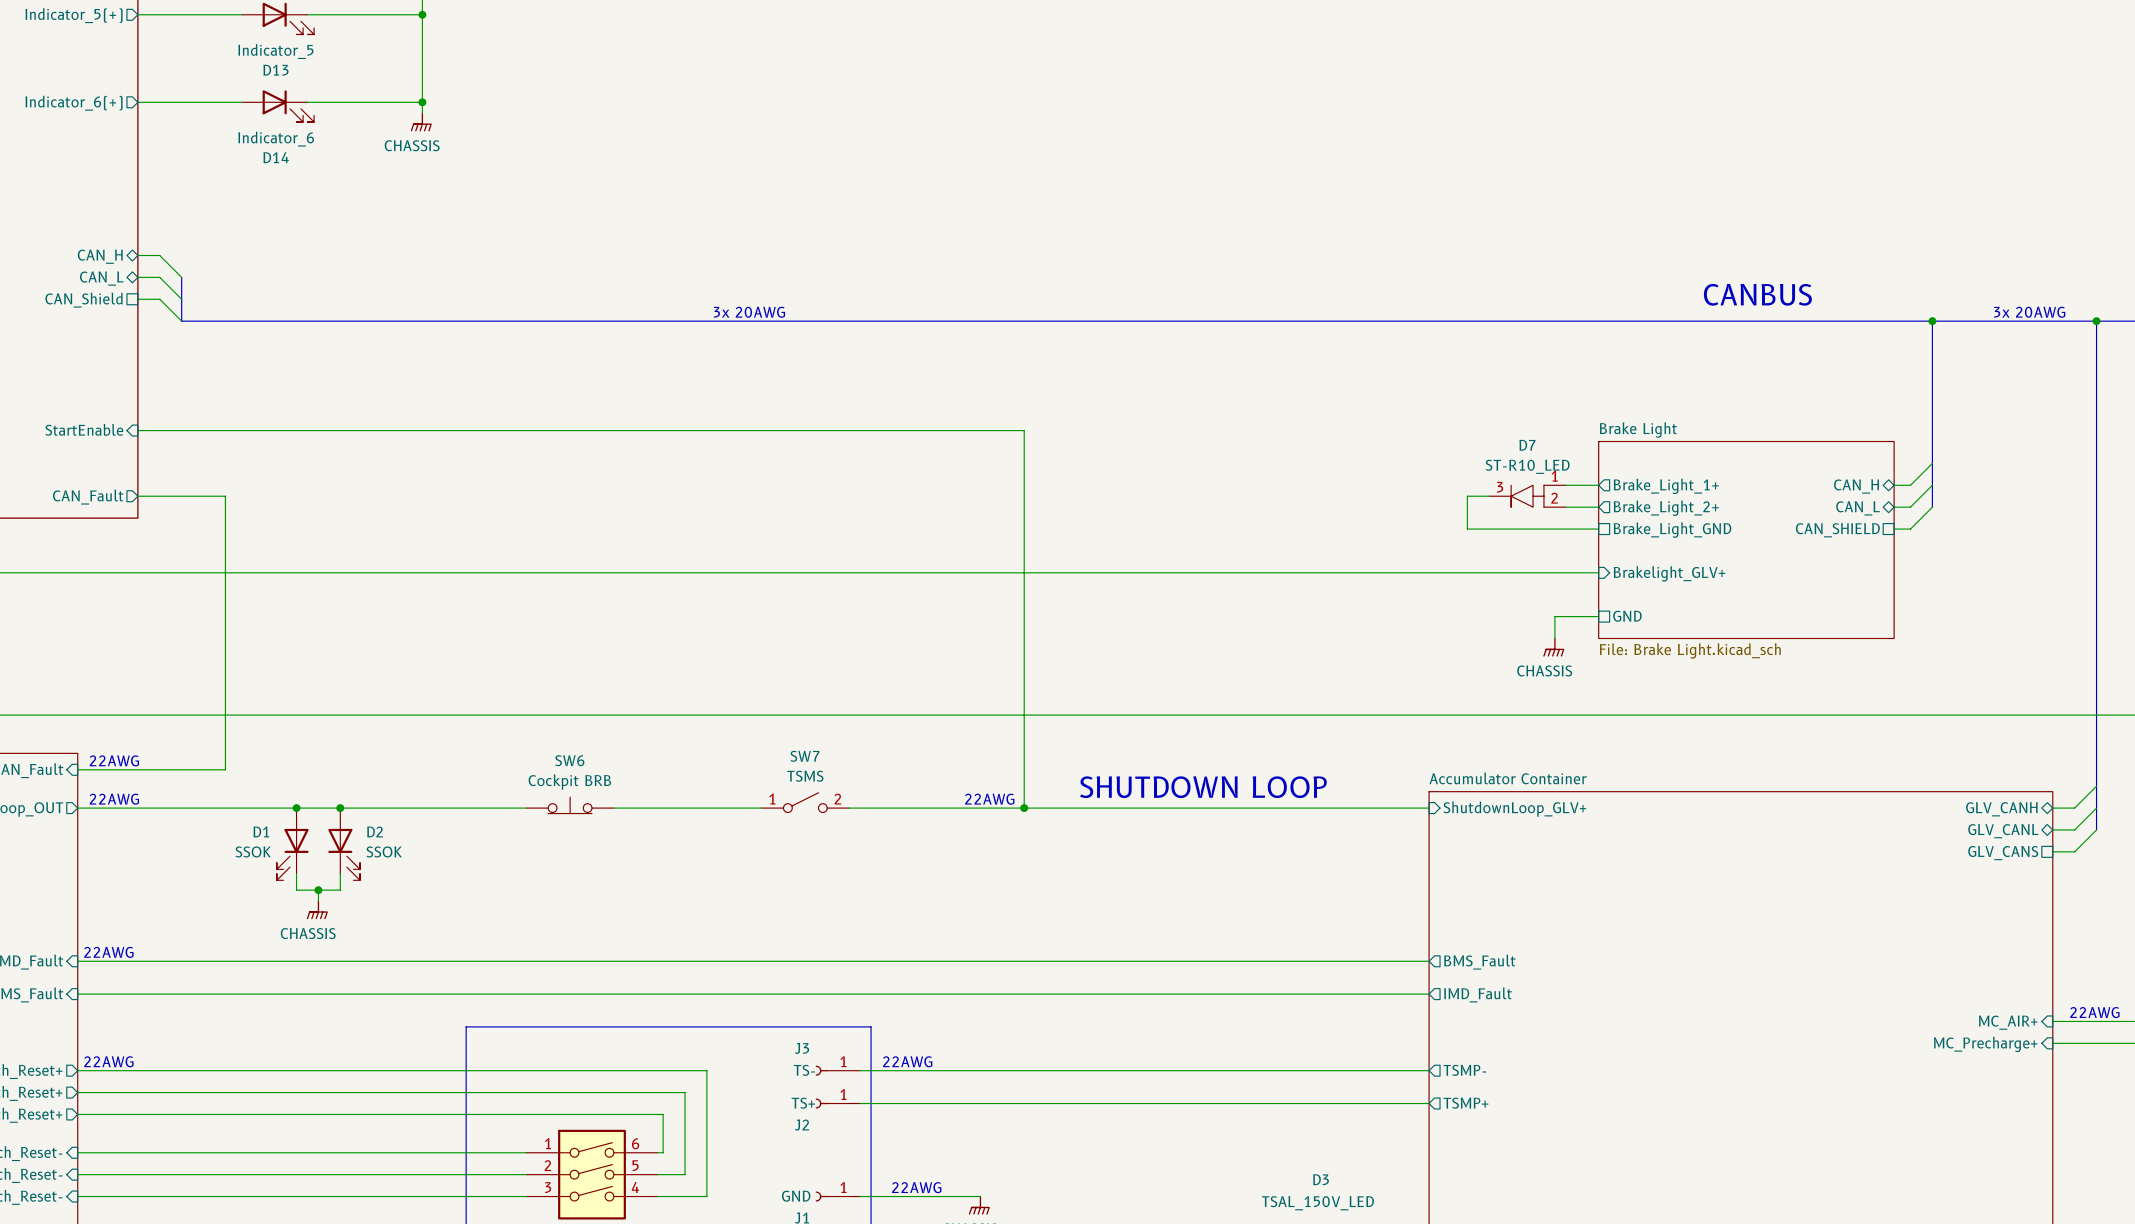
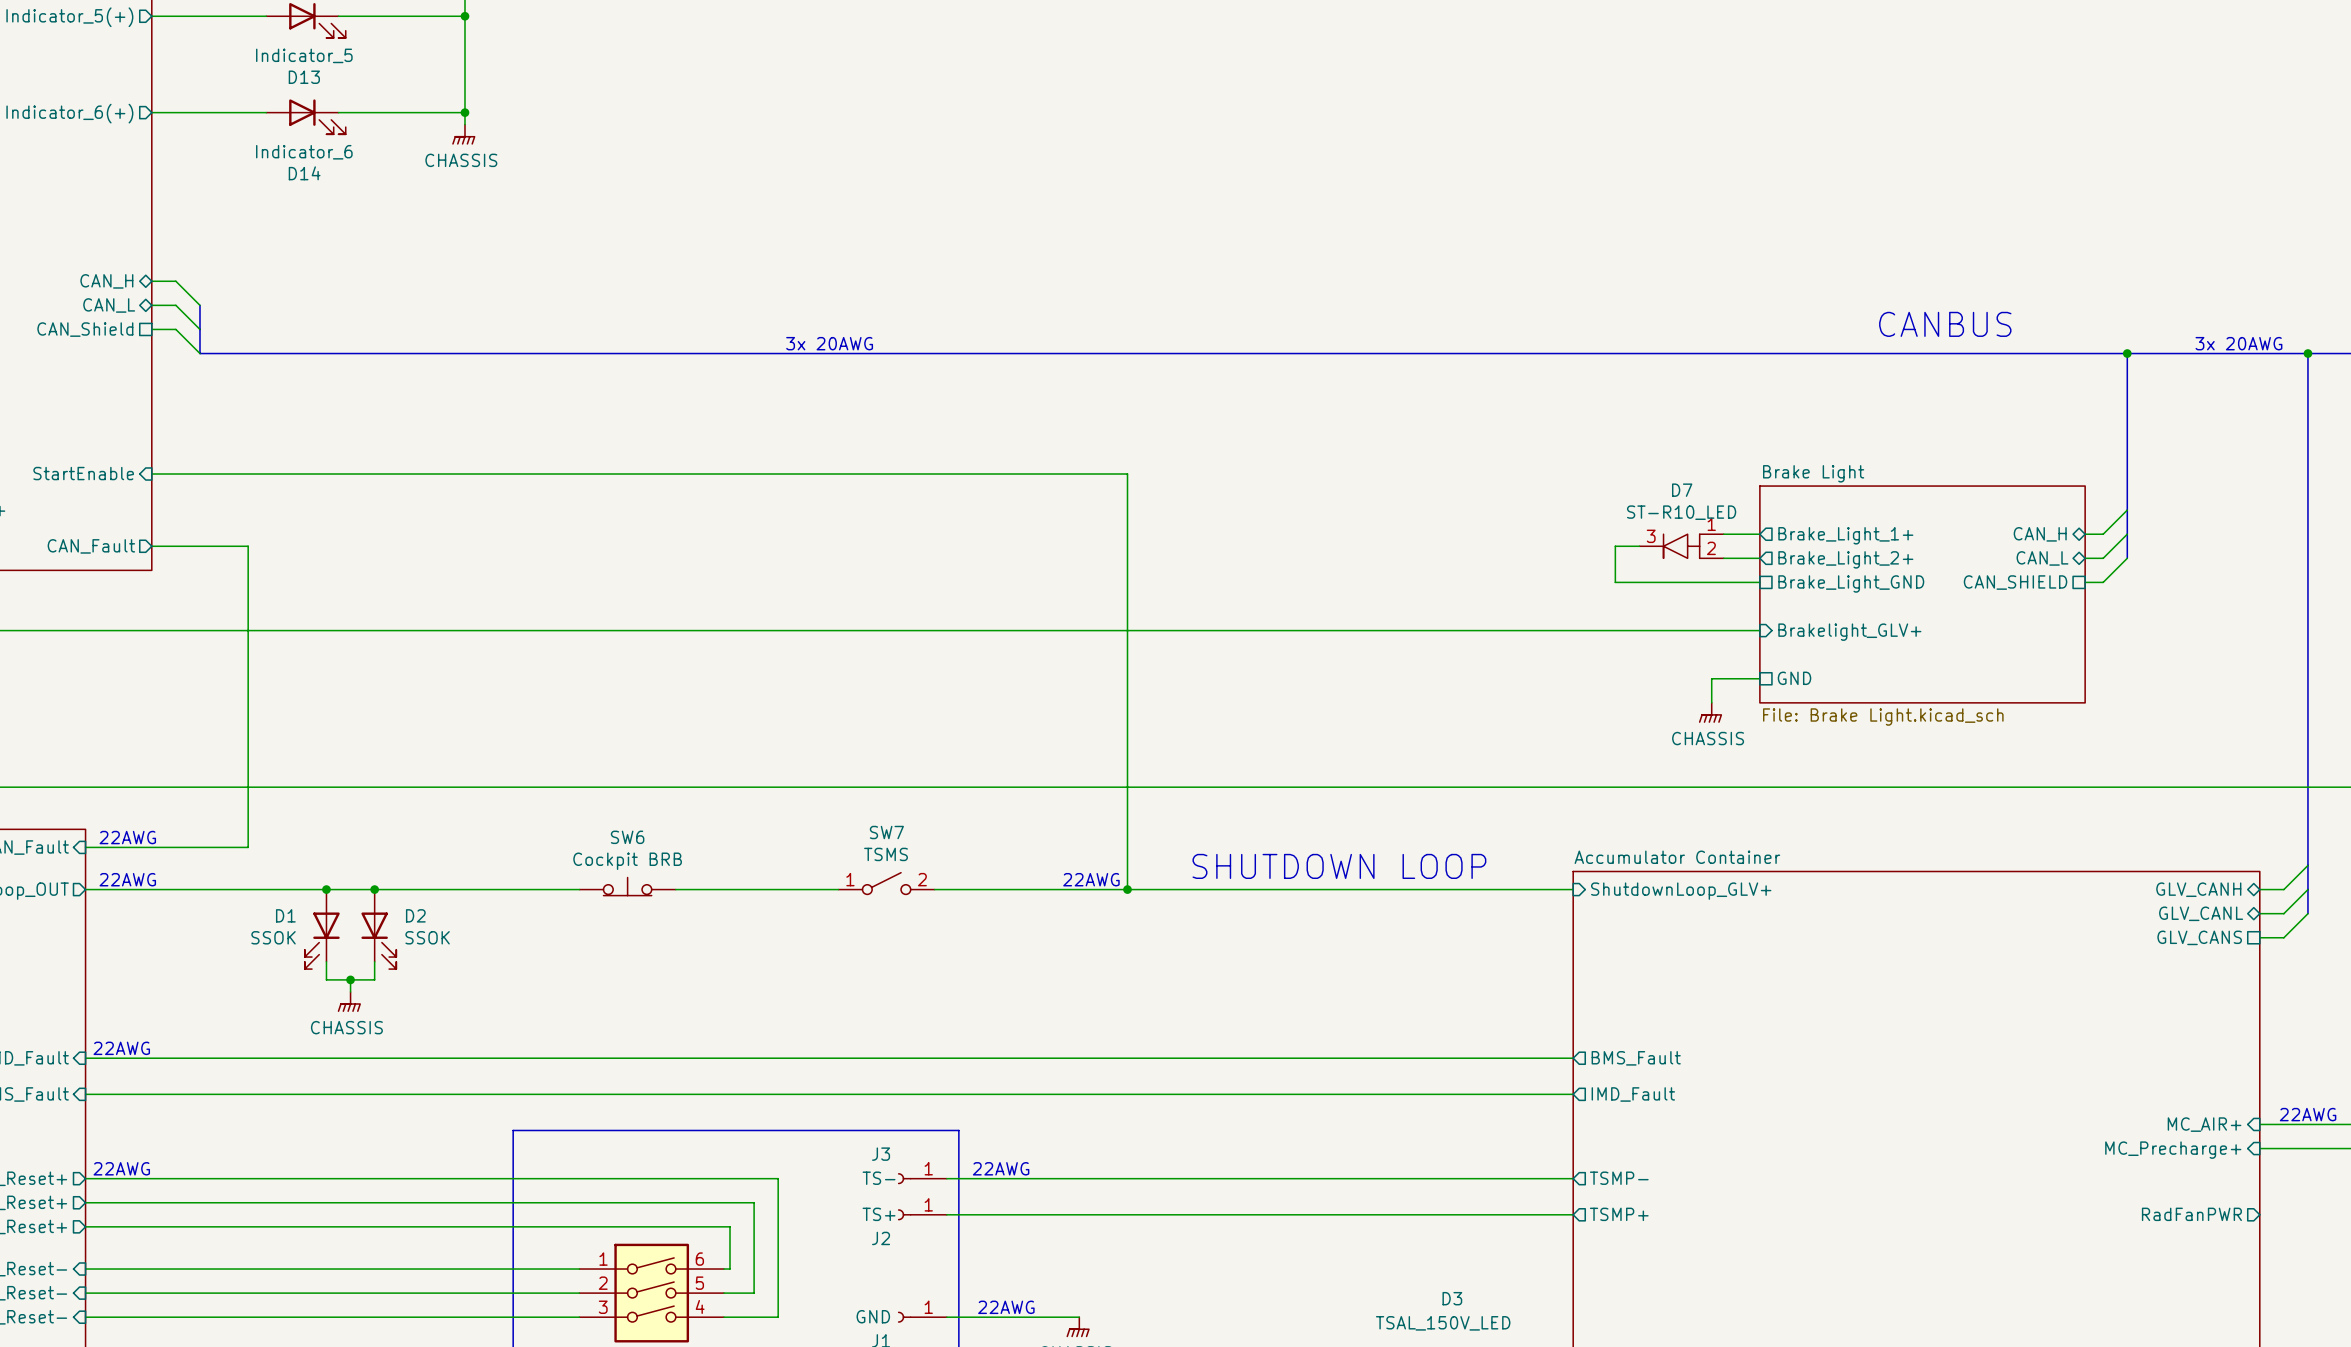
sheet pin: none -> RadFanPWR (2191, 1214)

